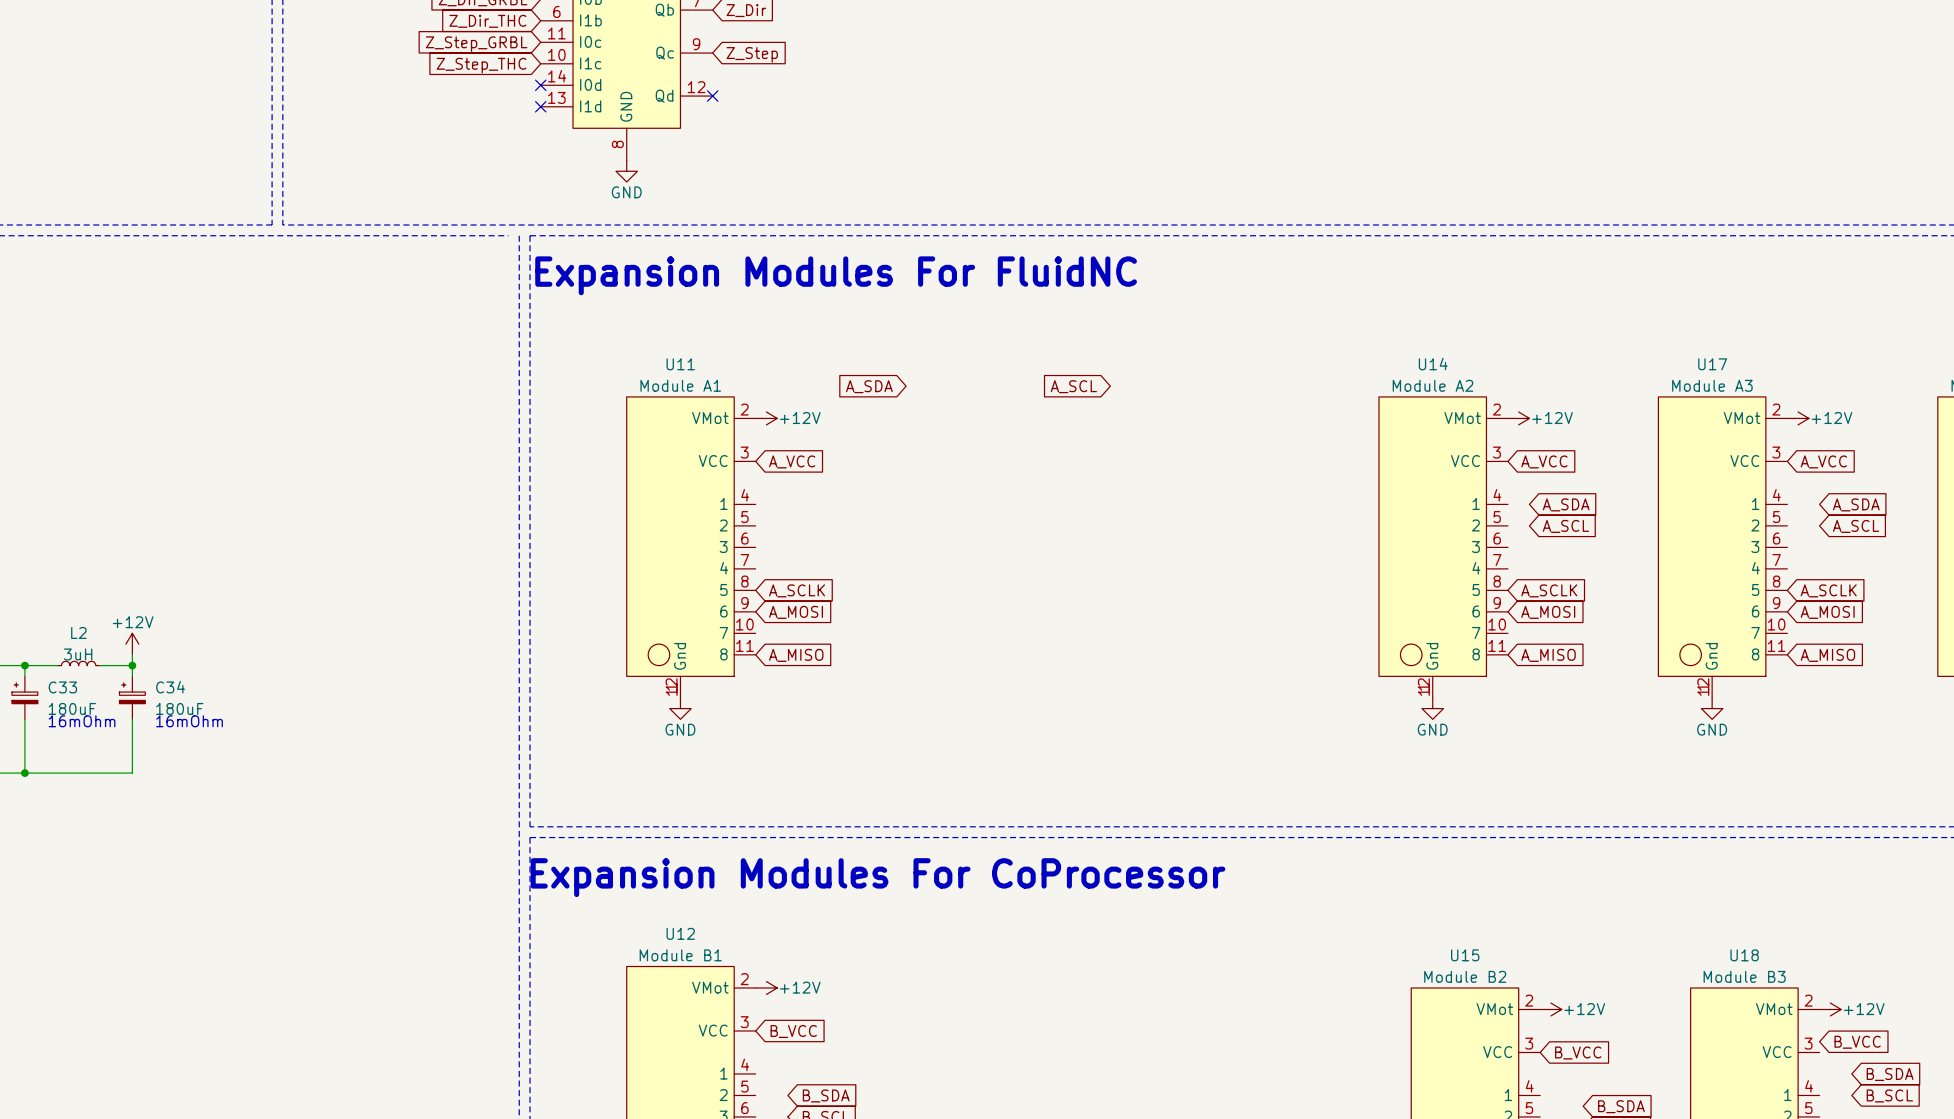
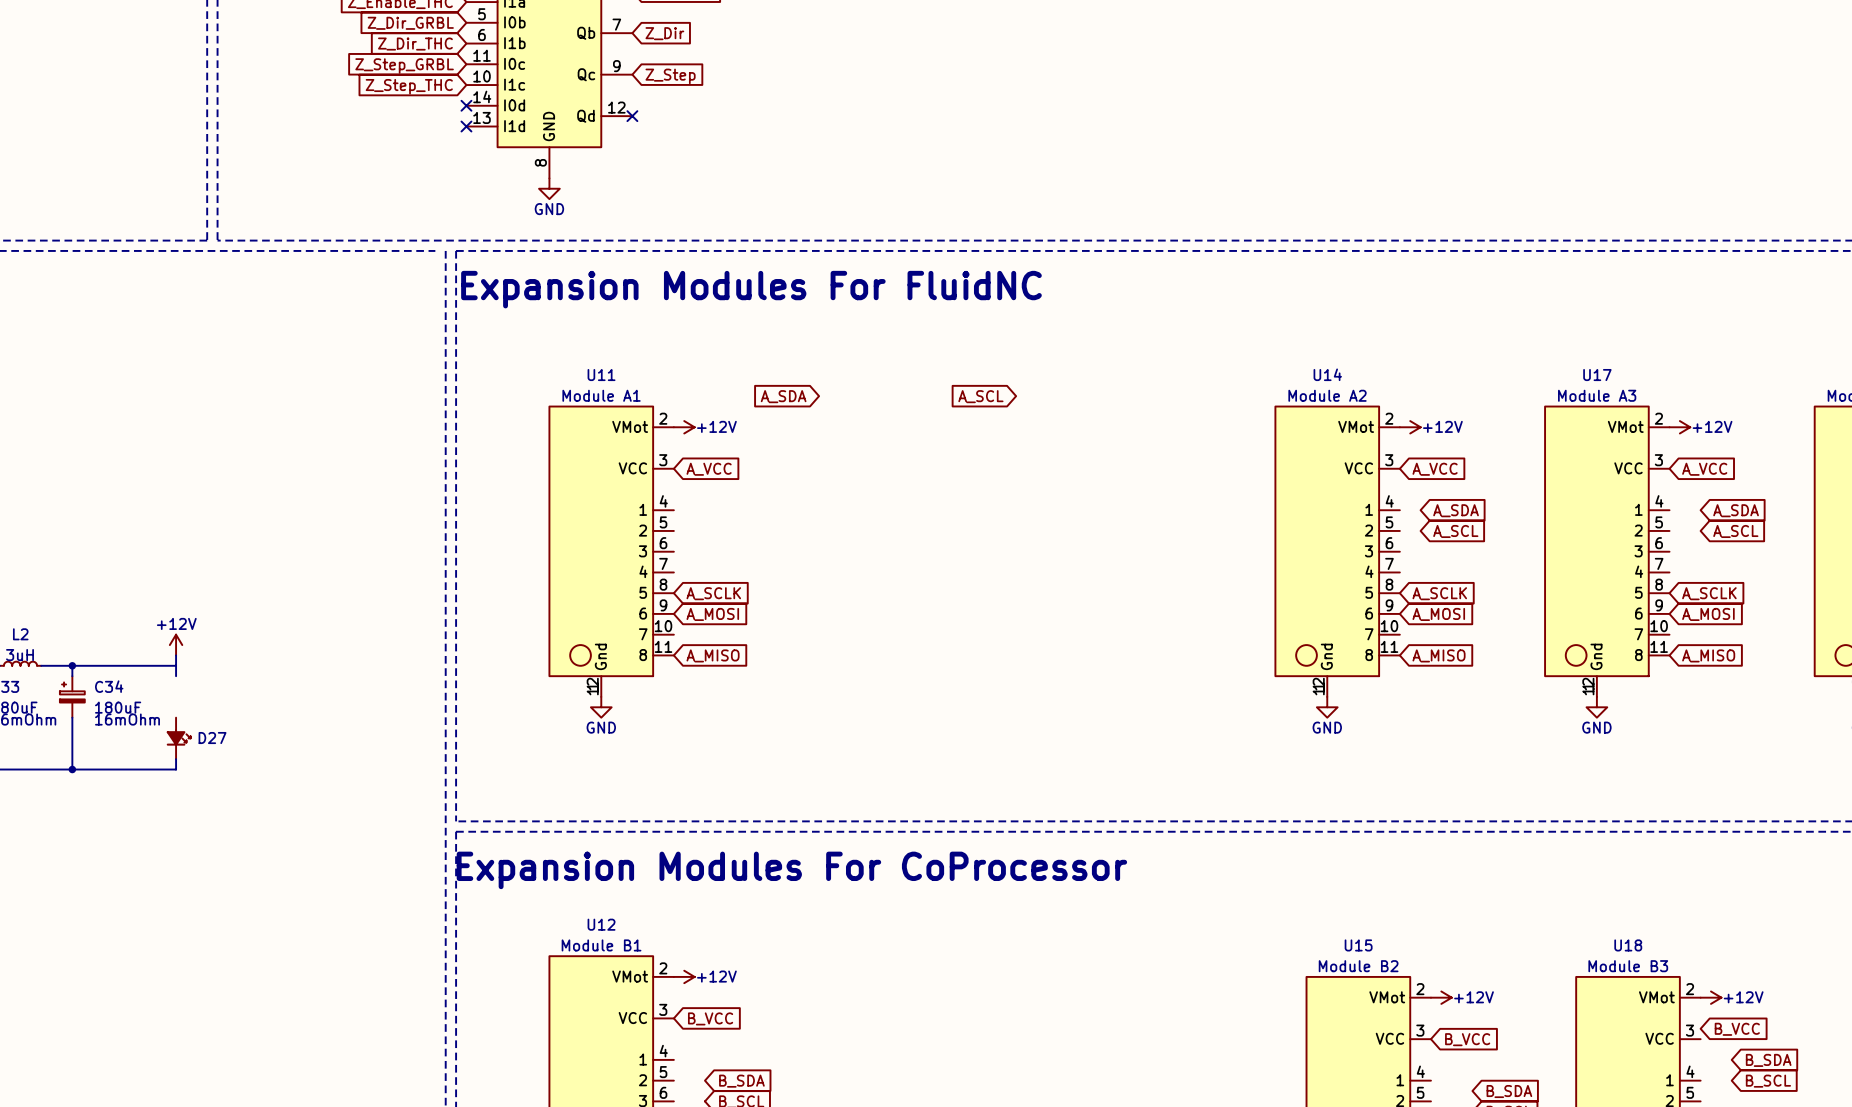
power symbol position: +12V (132, 644) -> +12V (176, 645)
wire: (132, 654) (132, 665) -> (176, 665) (72, 665)
wire: none -> (176, 655) (176, 676)
D27: none -> (178, 738)
wire: none -> (176, 759) (176, 769) (72, 769)
junction: none -> (72, 769)

